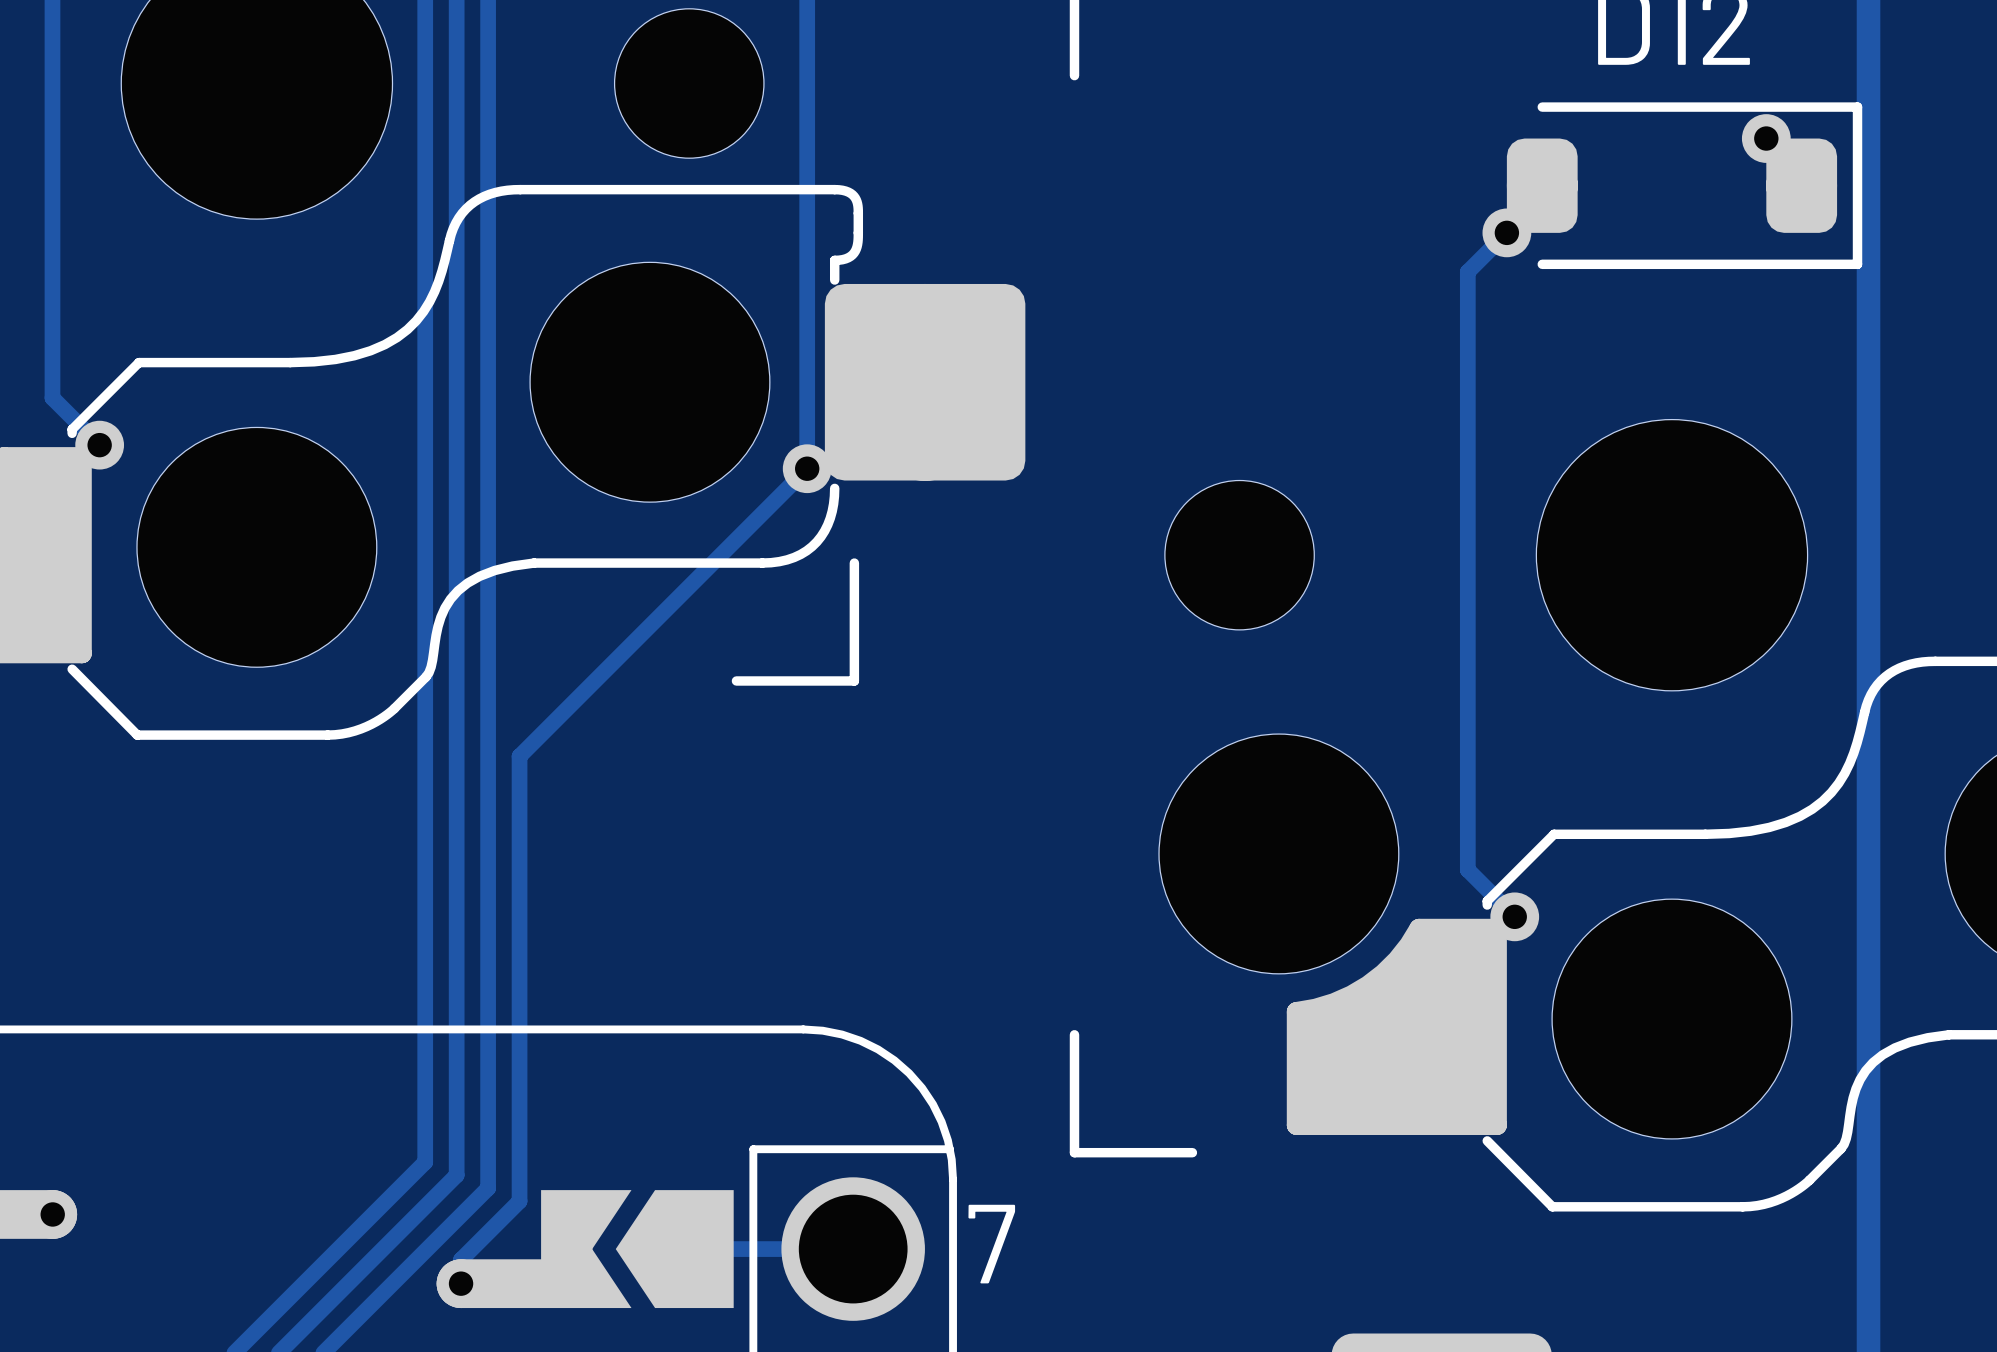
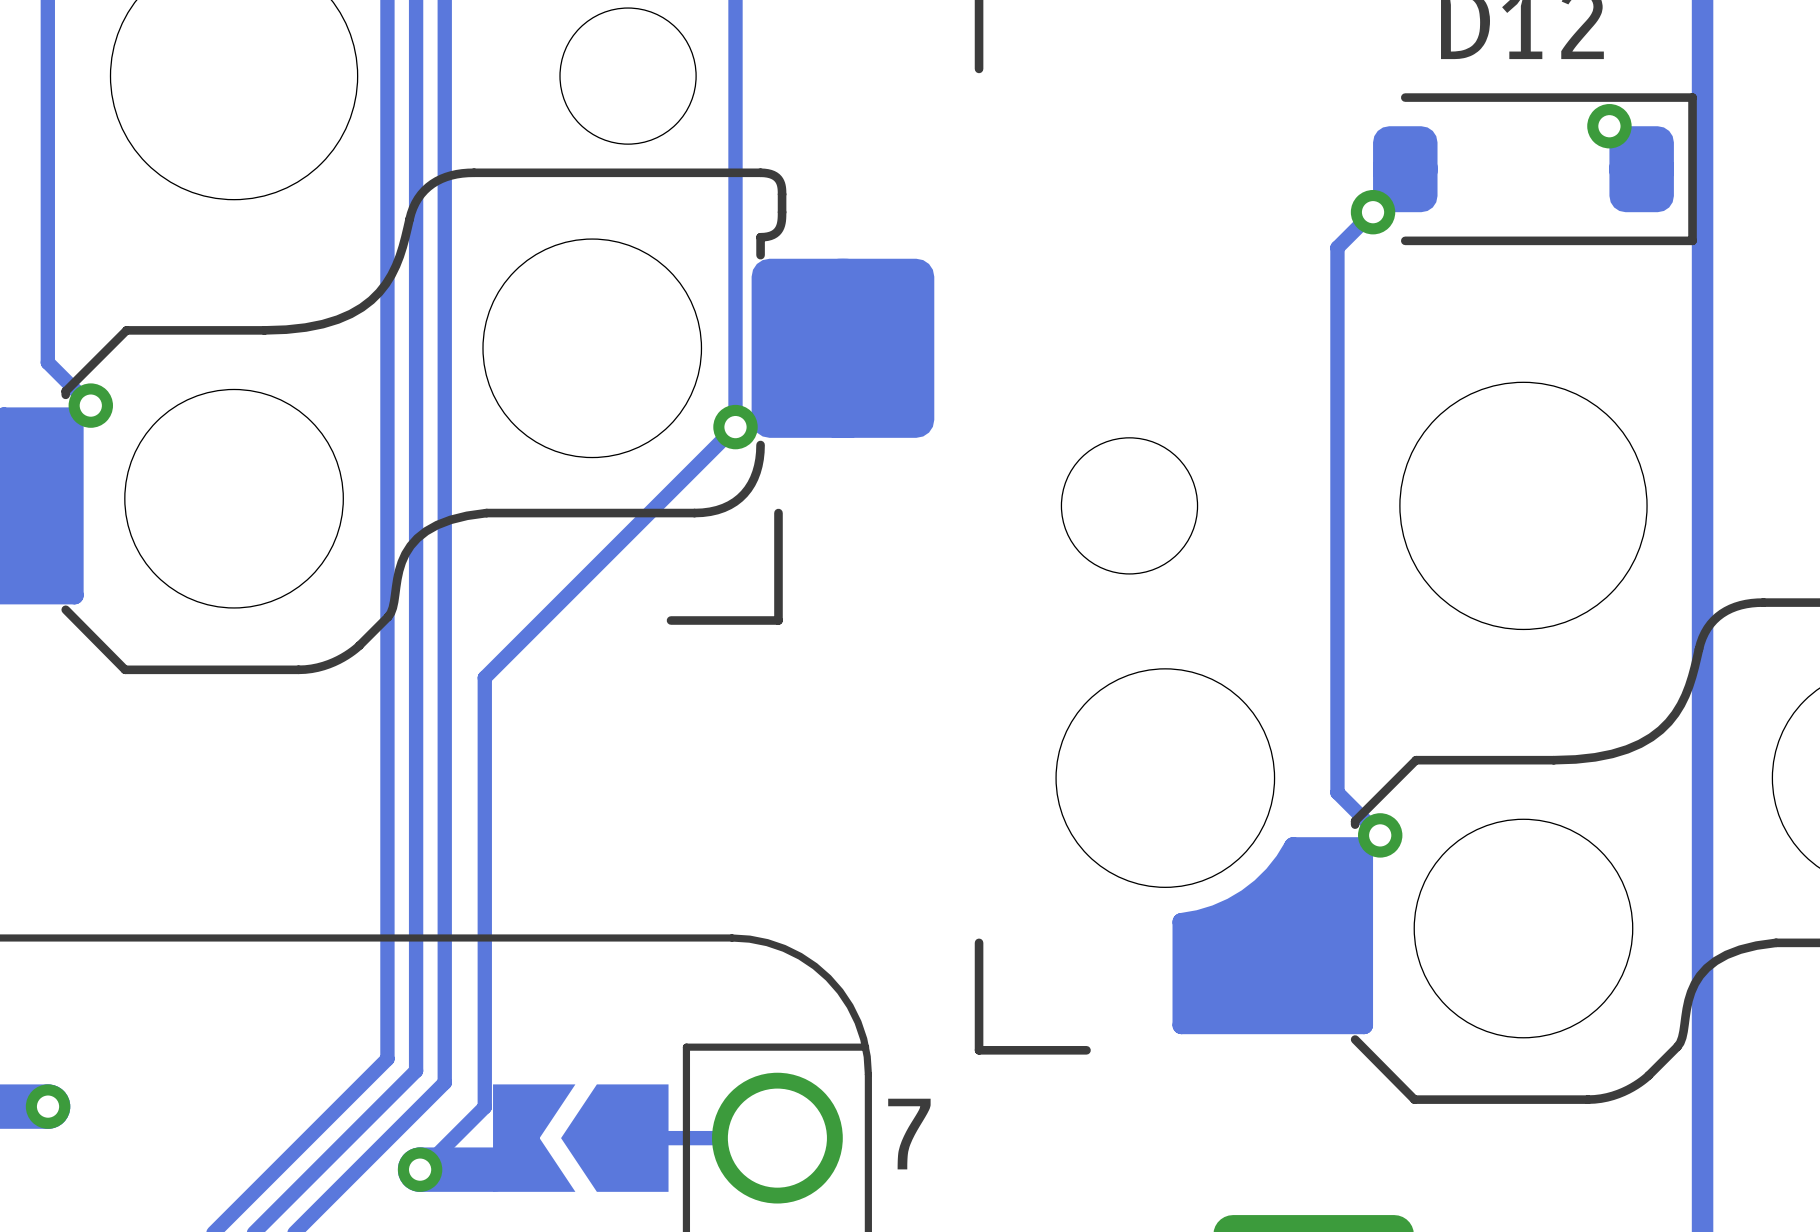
track: (532, 743) (519, 756) (519, 1201) (461, 1259) (461, 1283) -> (484, 677) (484, 1107) (422, 1169)

